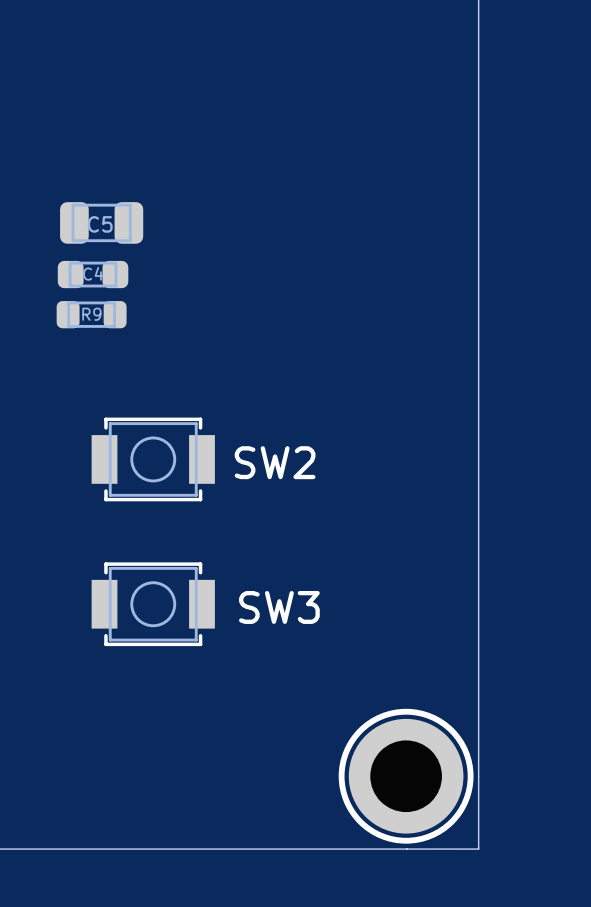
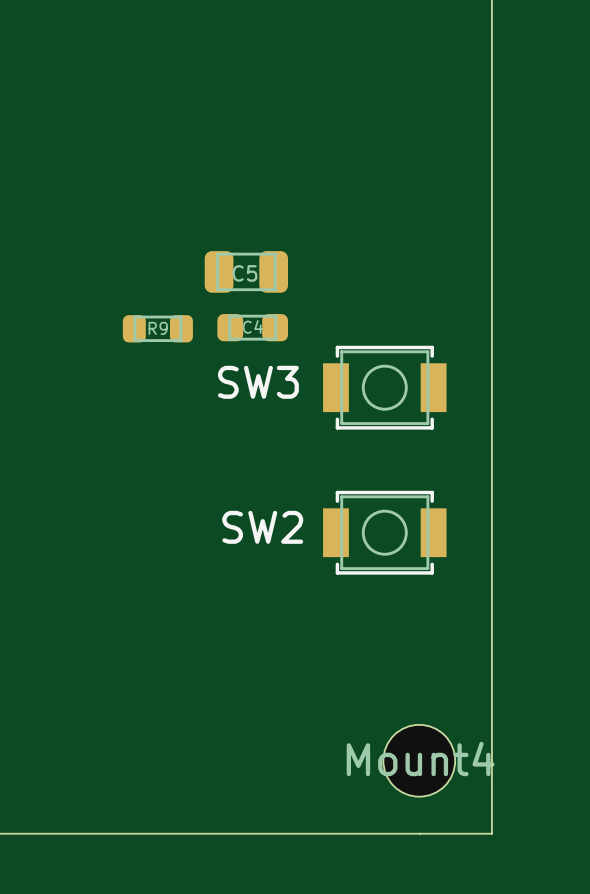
C5 position: (101, 222) -> (246, 271)
C4 position: (93, 274) -> (252, 327)
R9 position: (91, 314) -> (157, 328)
SW2 position: (153, 459) -> (384, 532)
SW2 name position: SW2 (275, 462) -> SW2 (262, 527)
SW3 position: (153, 604) -> (384, 387)
SW3 name position: SW3 (279, 607) -> SW3 (258, 382)
part: (406, 776) -> none
Mount4: none -> (419, 760)

